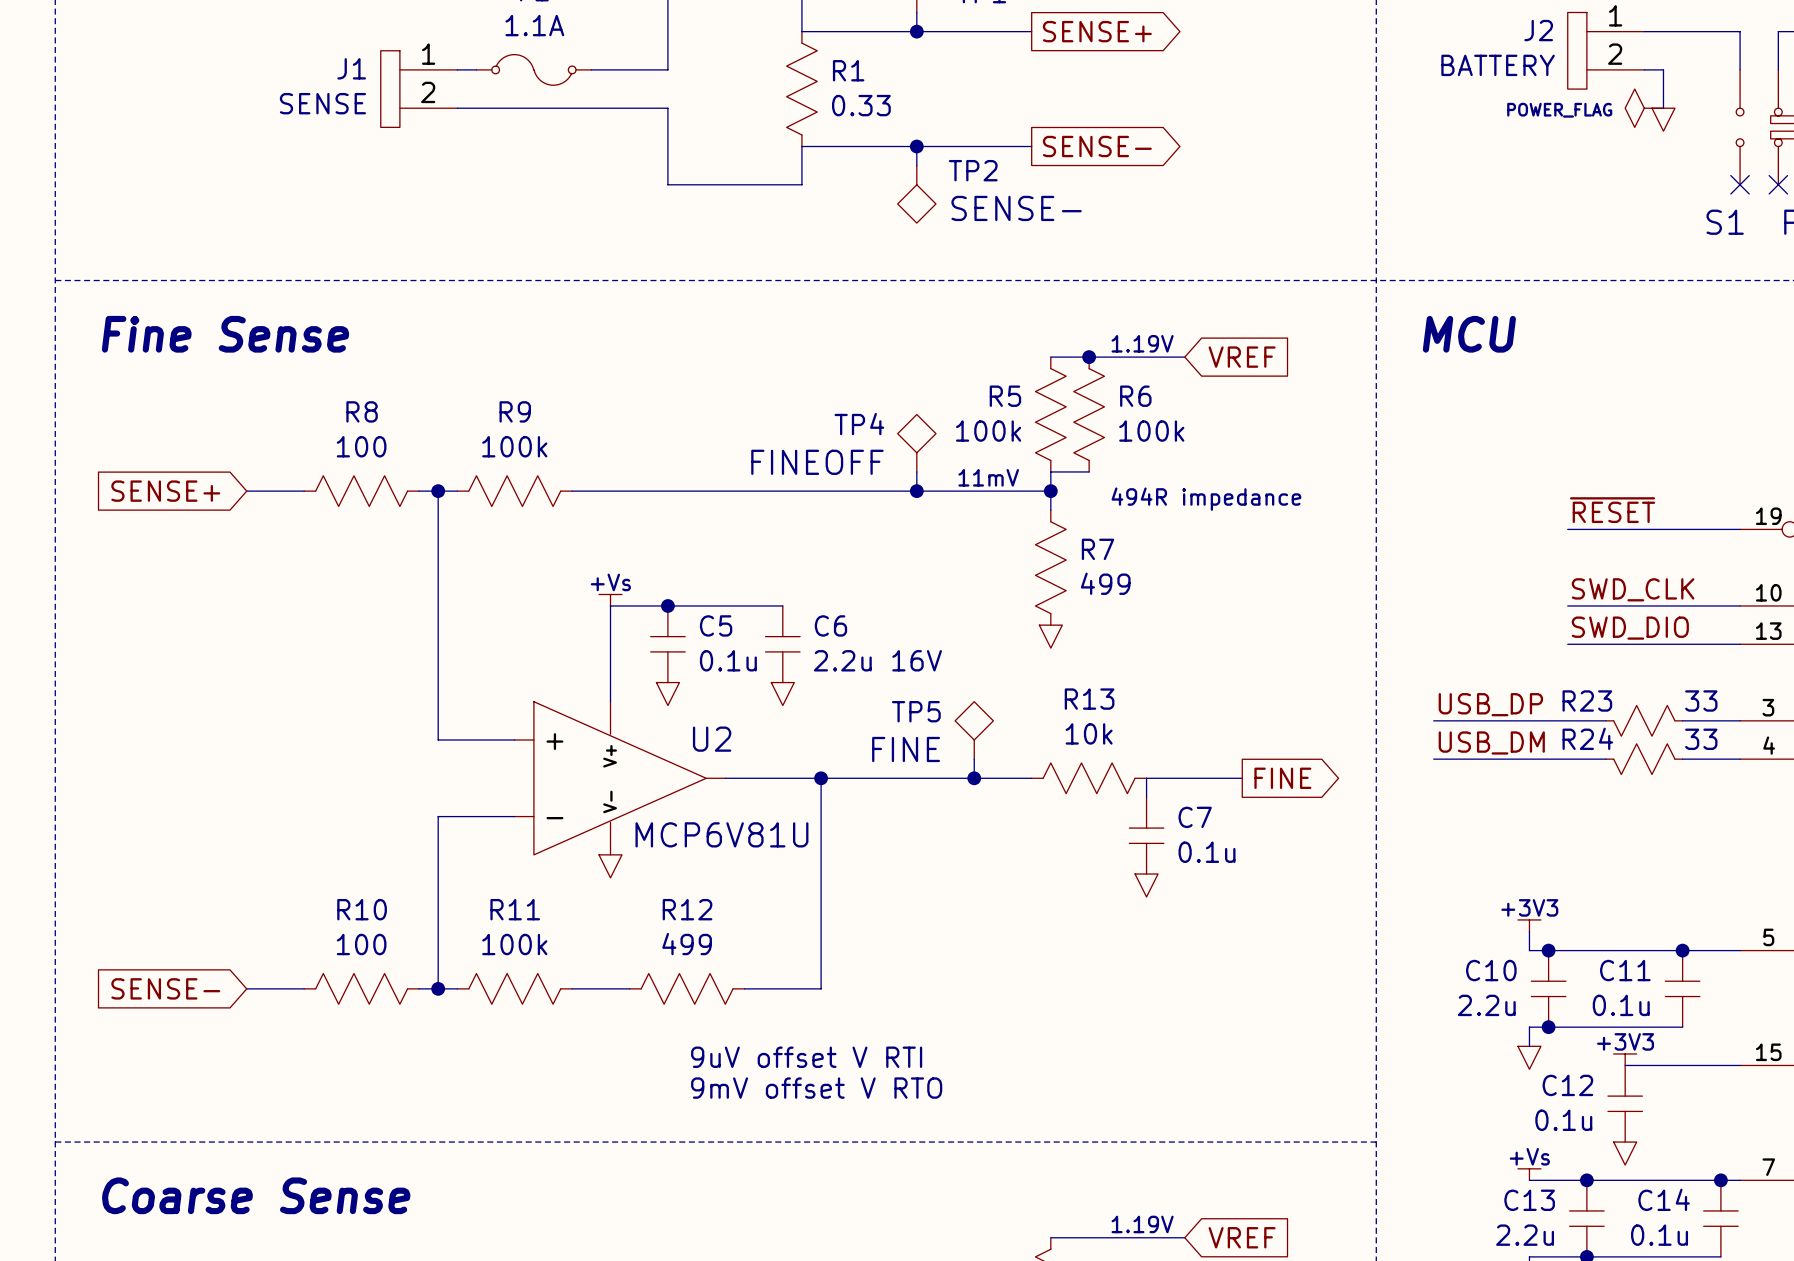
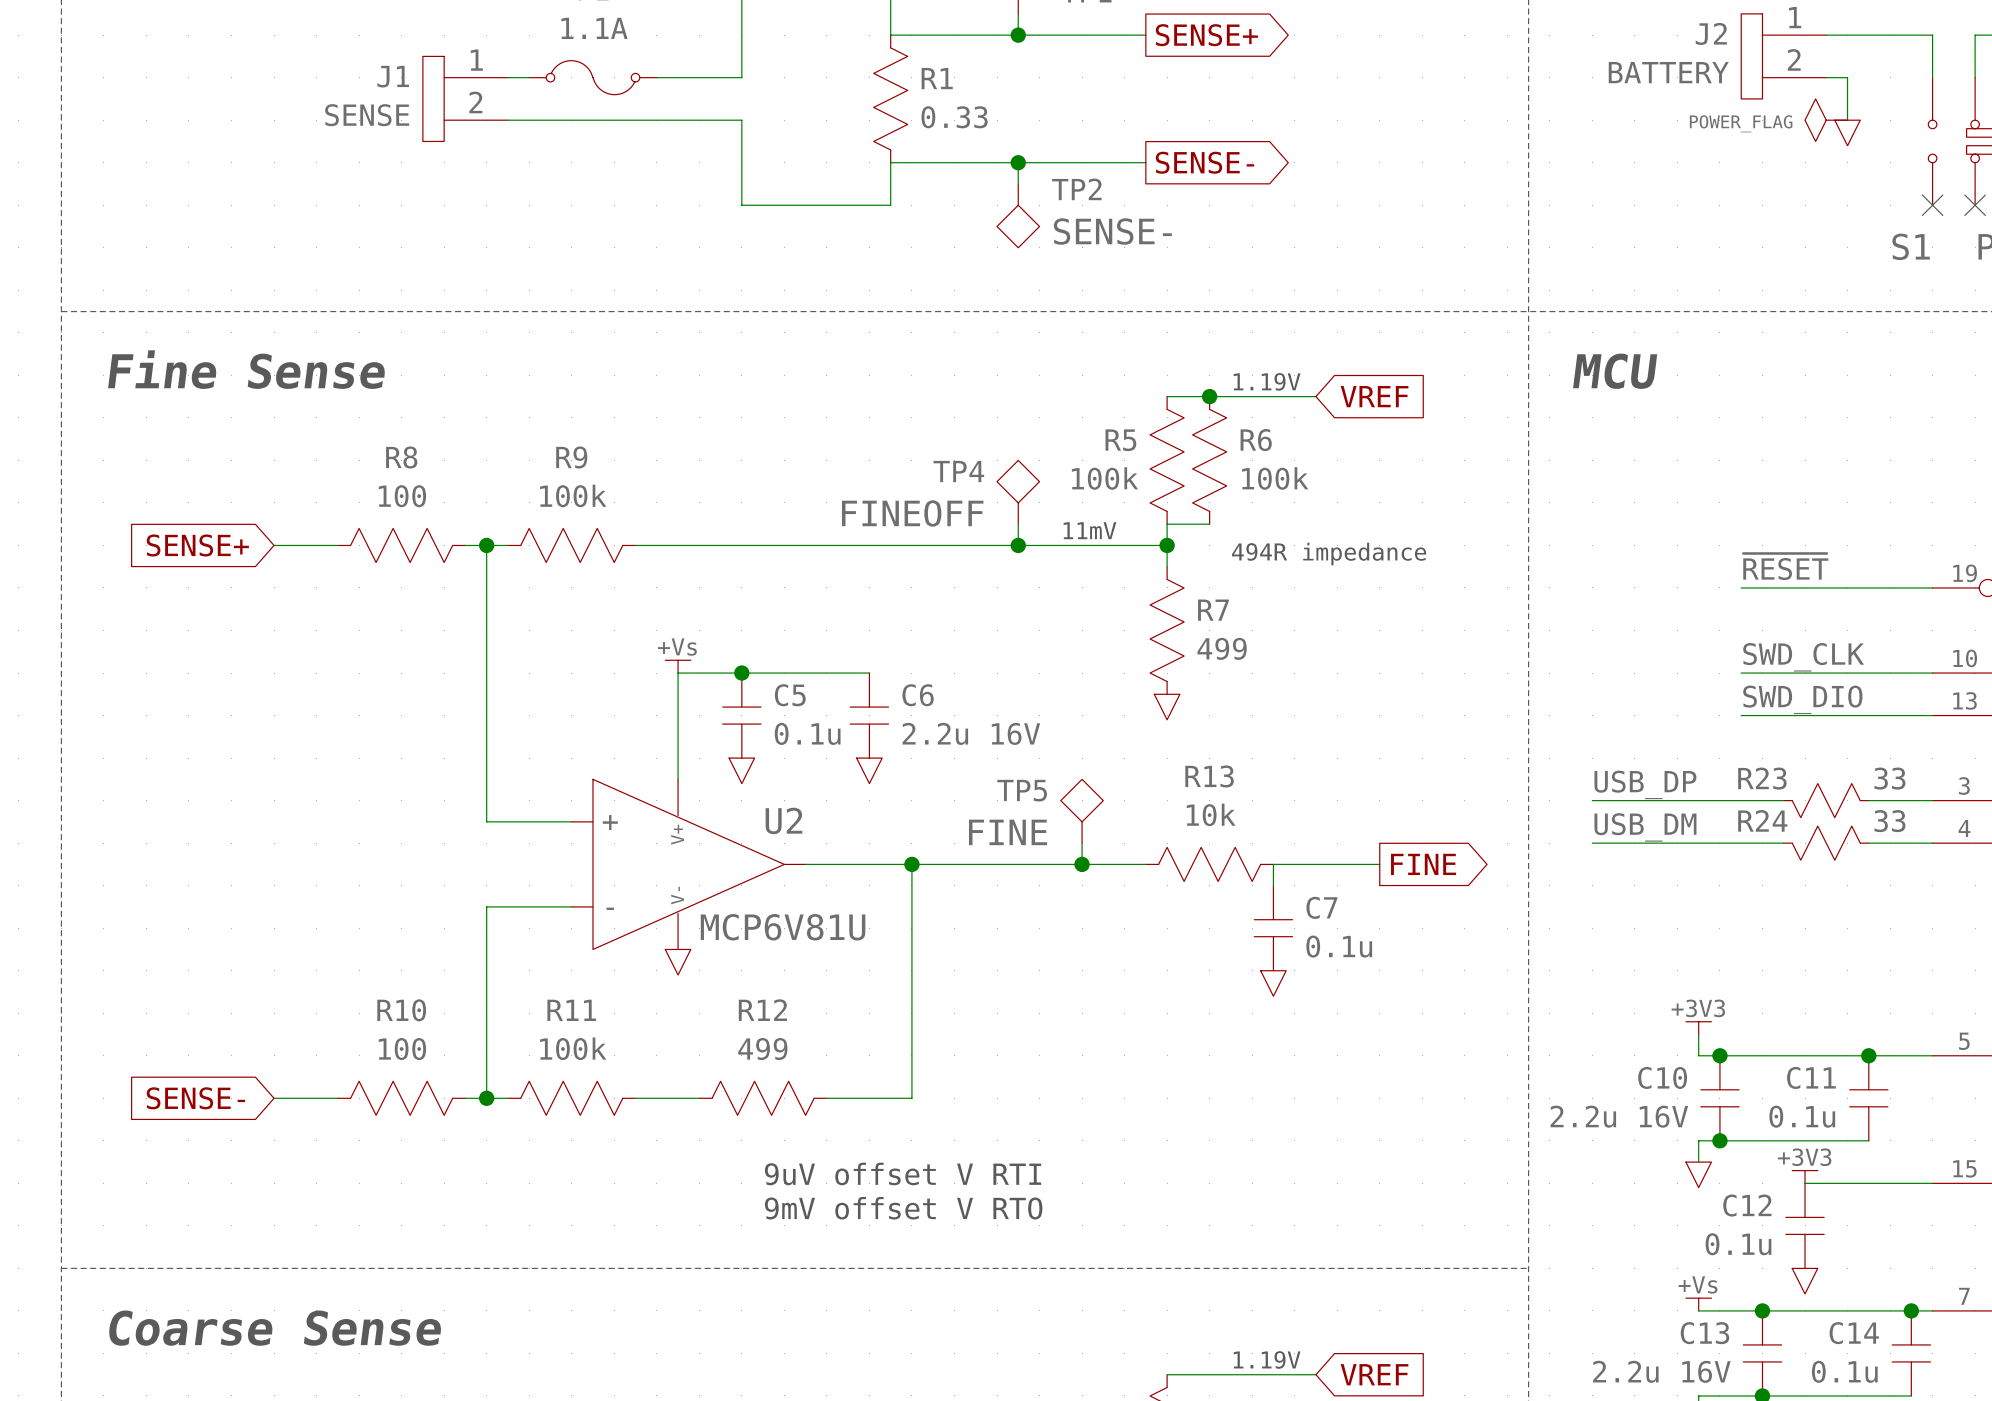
C10 value: 2.2u (1486, 1005) -> 2.2u 16V (1619, 1116)
C13 value: 2.2u (1525, 1235) -> 2.2u 16V (1661, 1371)

